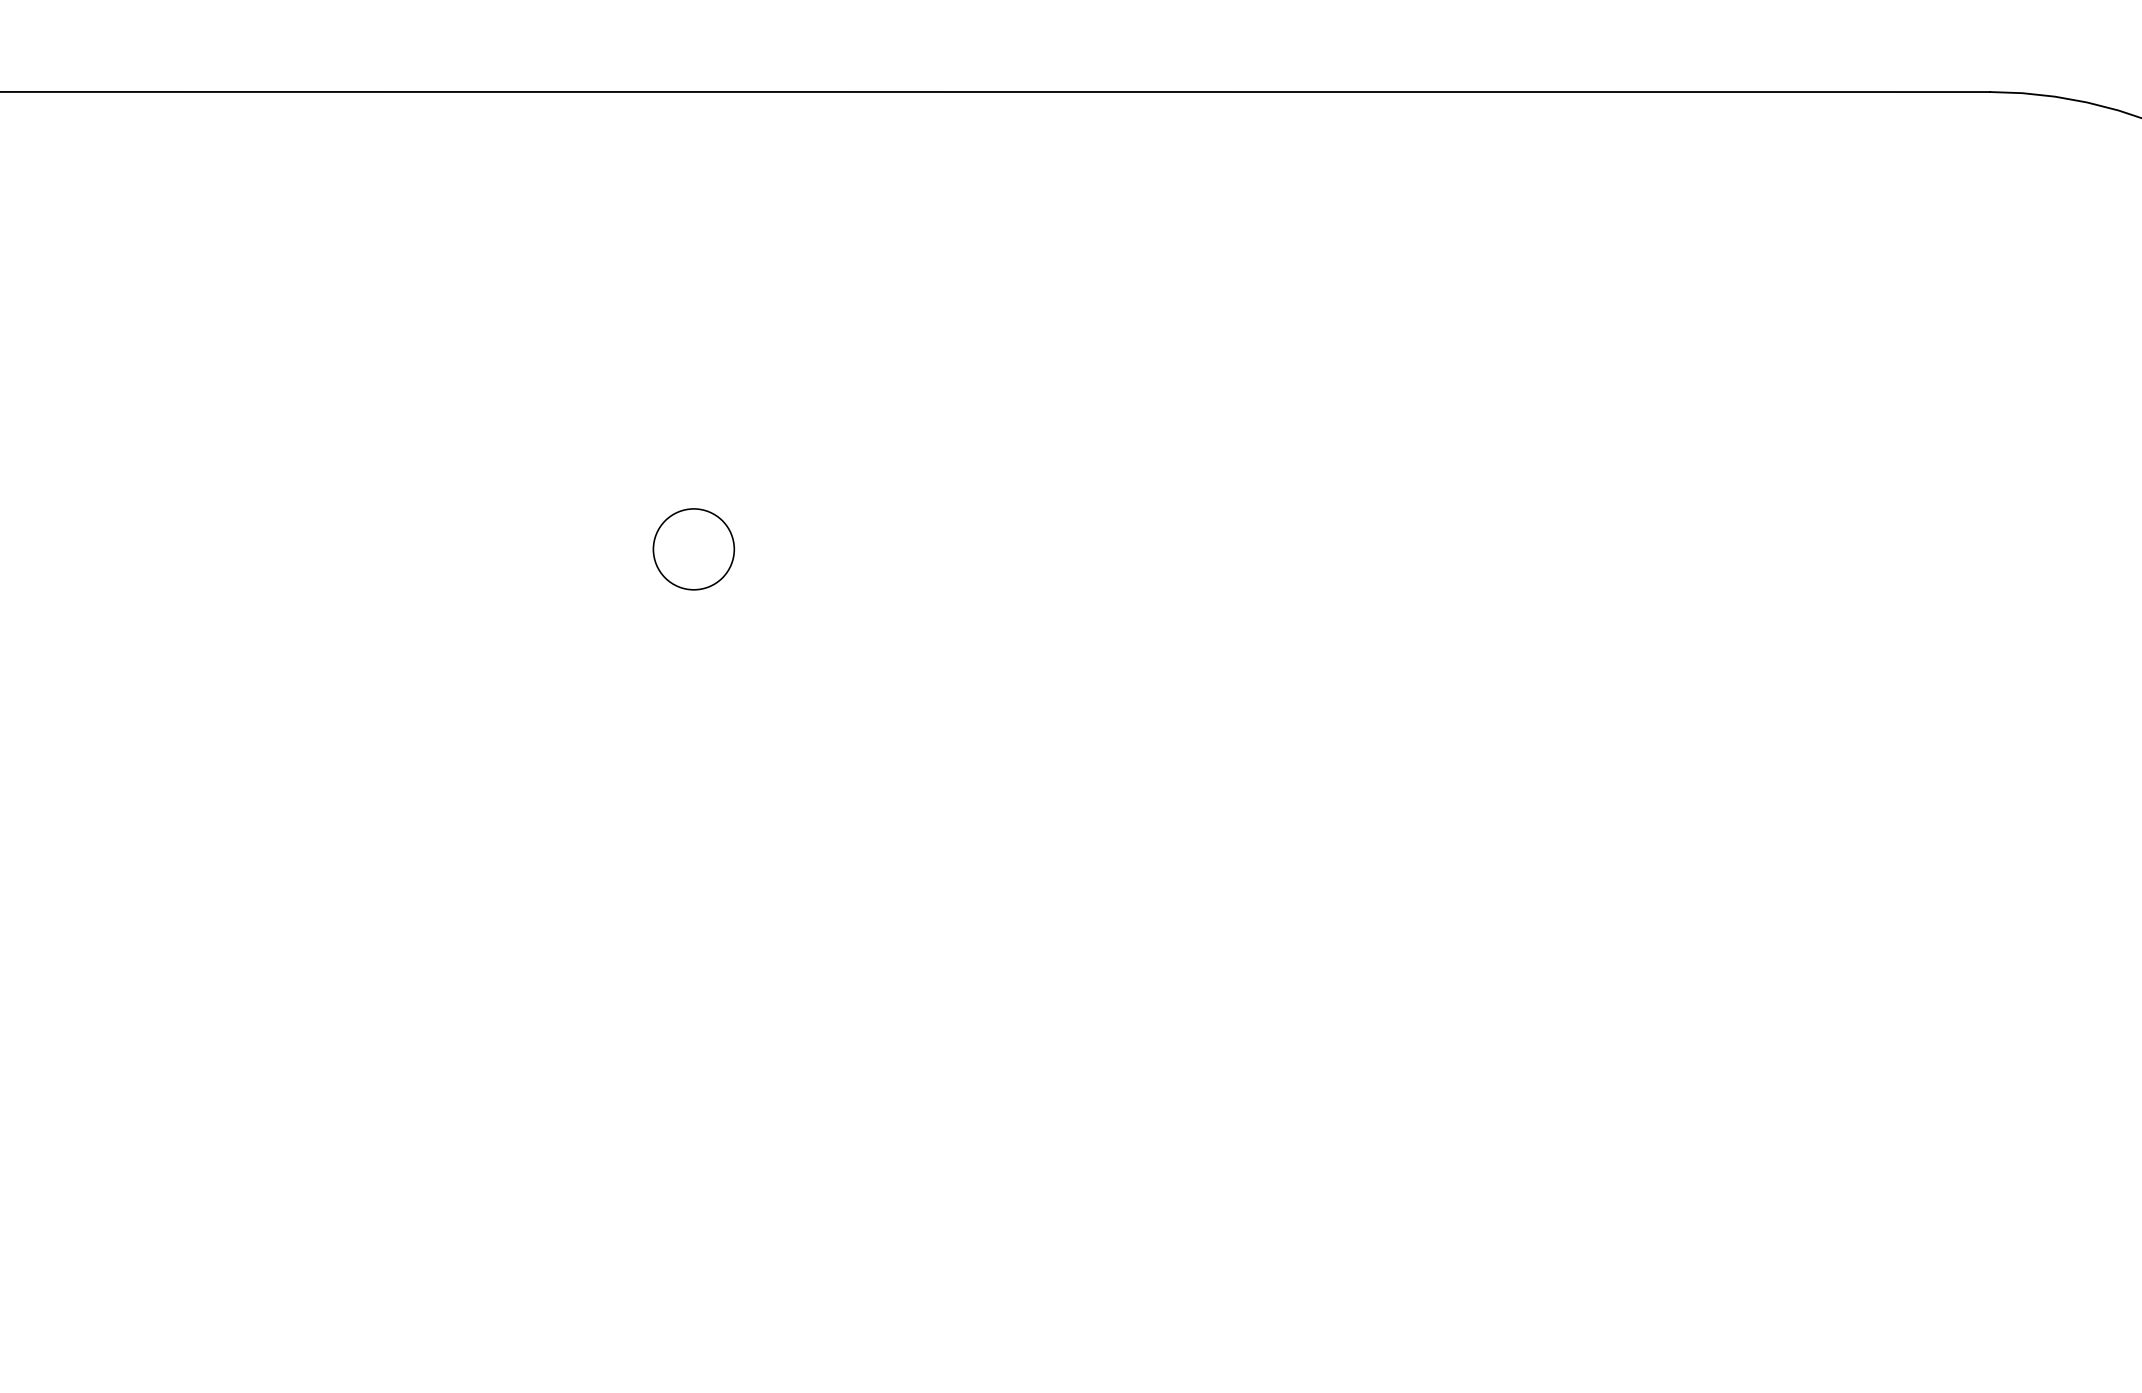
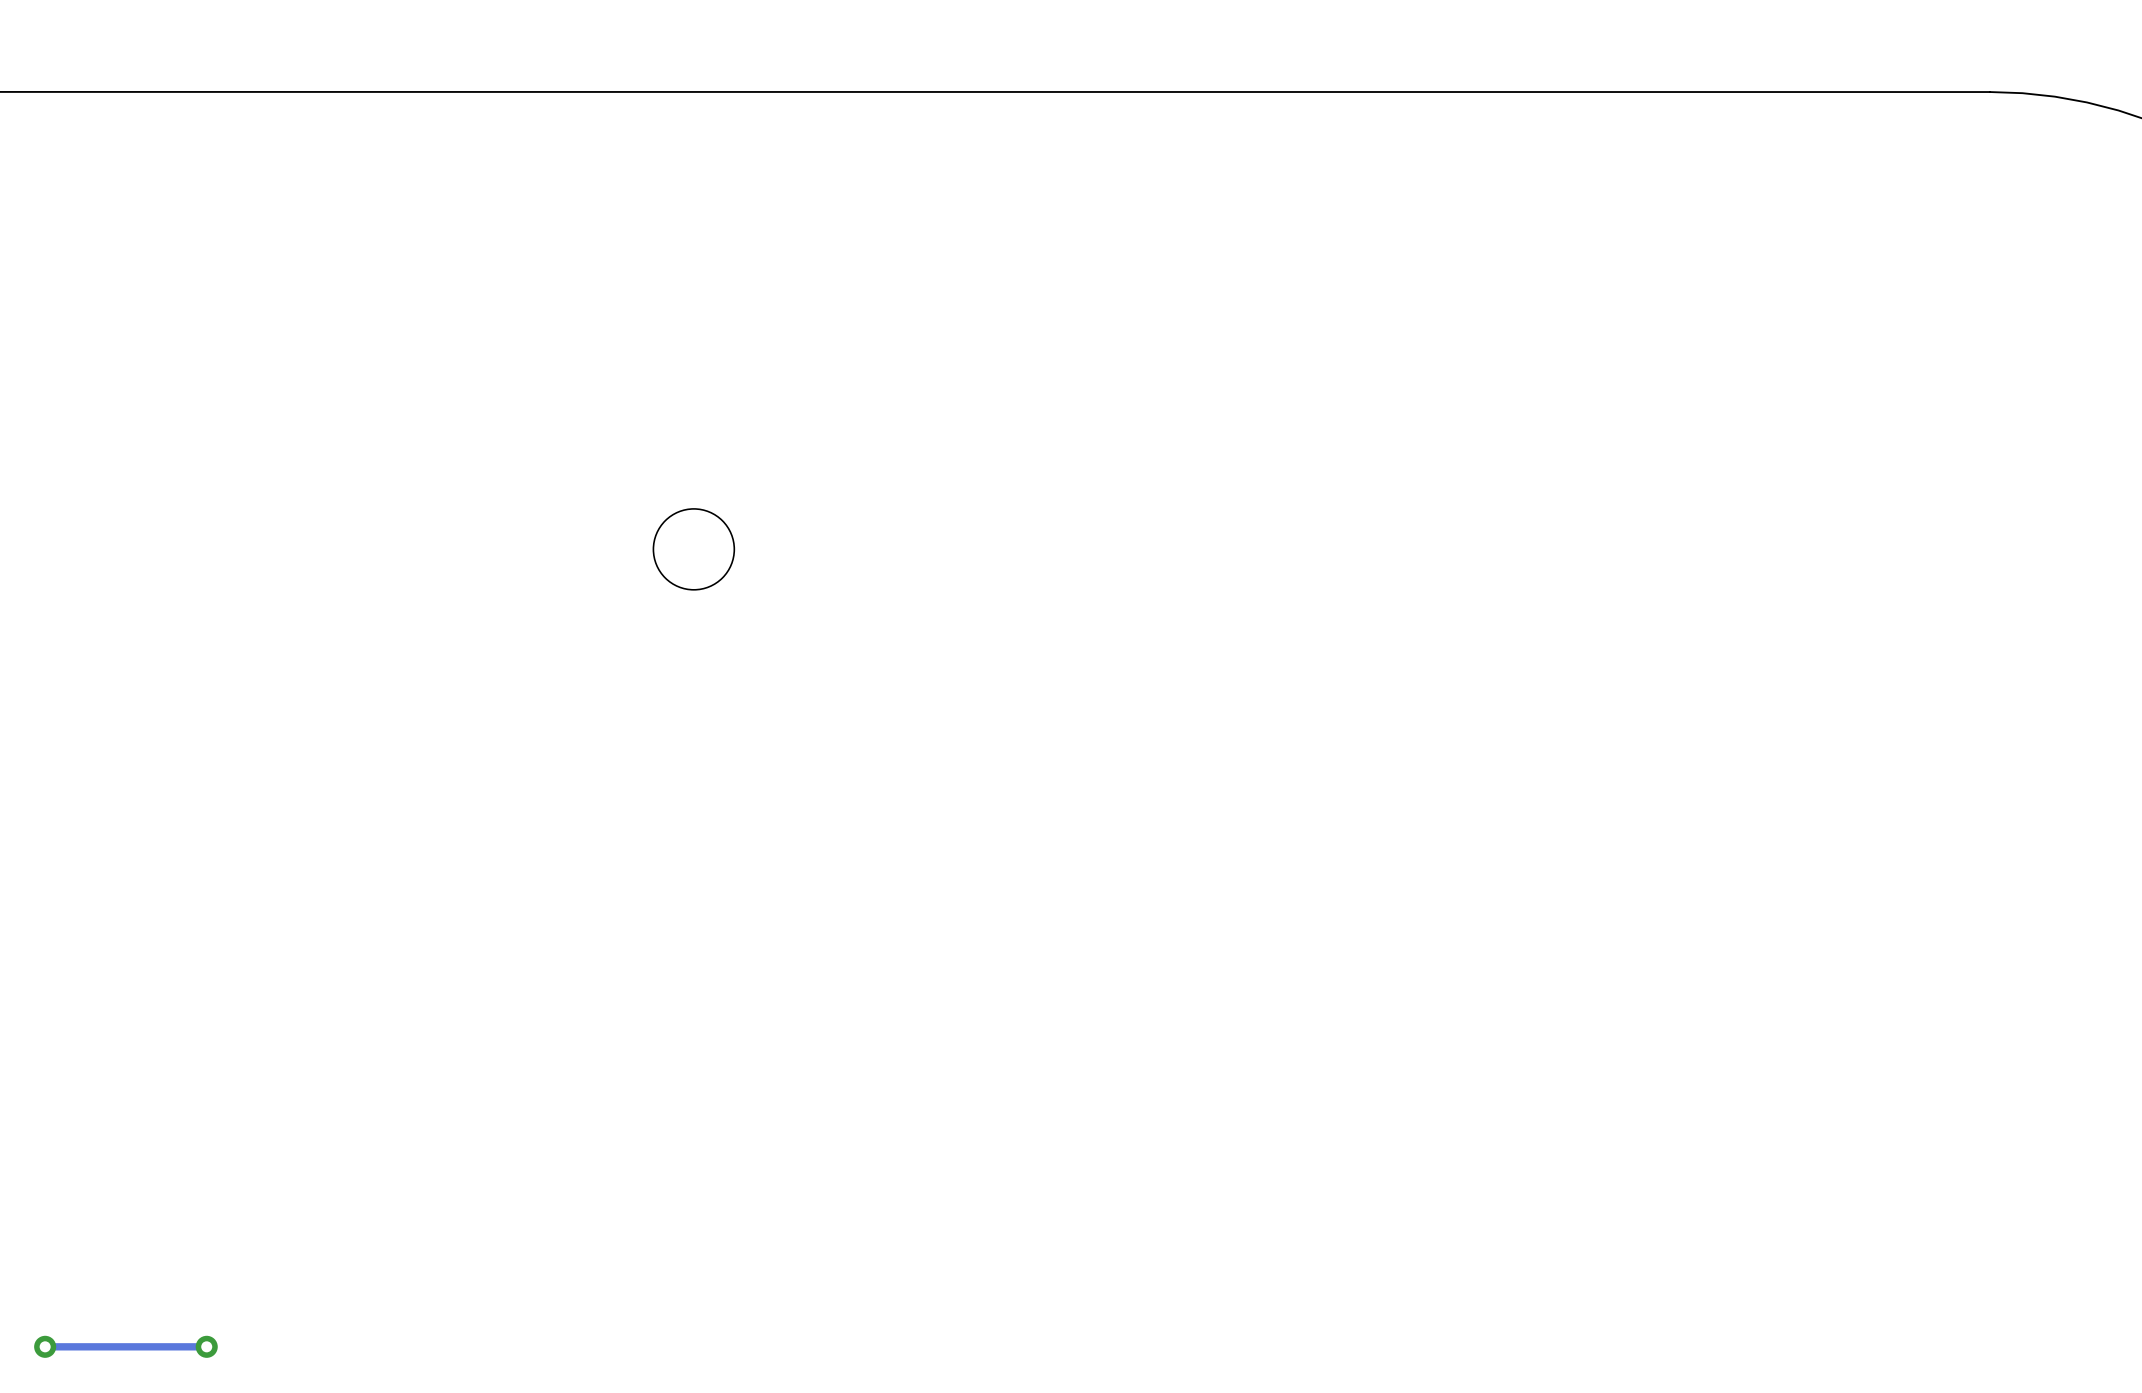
via: none -> (45, 1346)
track: none -> (206, 1346) (45, 1346)
via: none -> (206, 1346)

